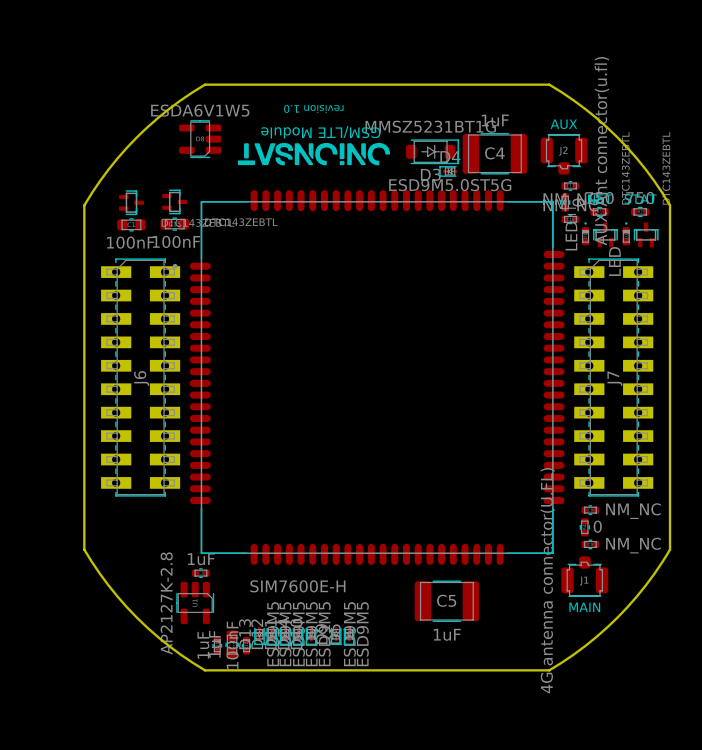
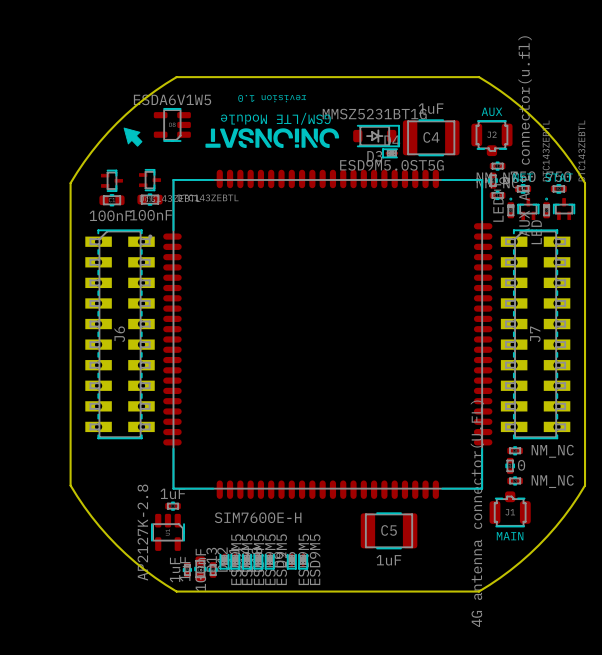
drawing: none -> [123, 127, 143, 147]

